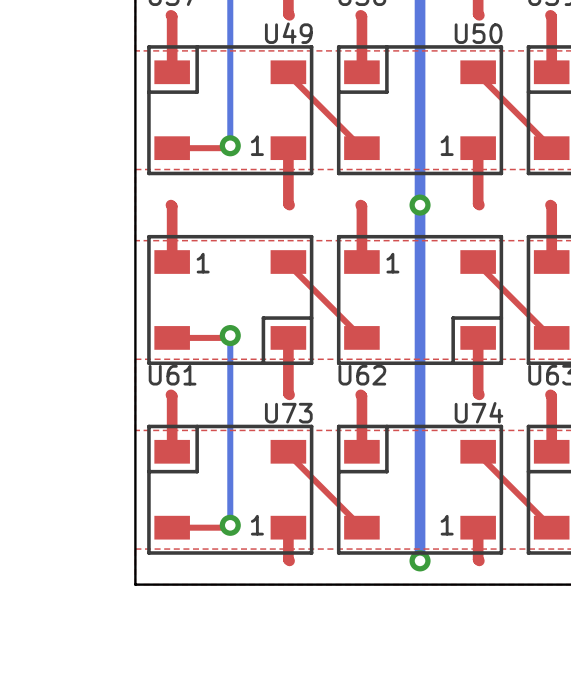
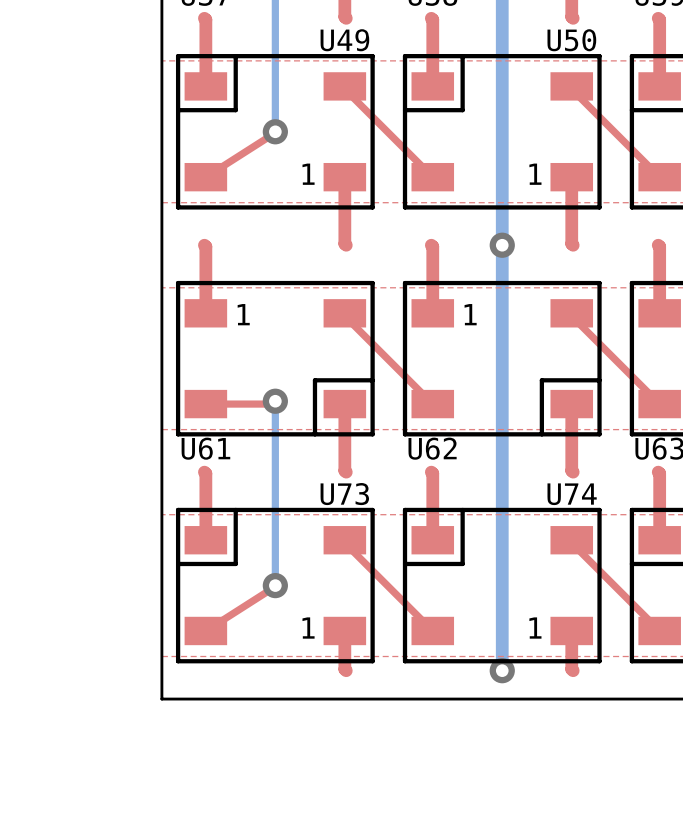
bottom track: (230, 110) (230, 145) -> none
top track: (230, 145) (227, 148) (172, 148) -> (275, 131) (205, 177)
via position: (230, 145) -> (275, 131)
bottom track: (230, 489) (230, 525) -> none
top track: (230, 525) (227, 527) (172, 527) -> (275, 585) (205, 630)
via position: (230, 525) -> (275, 585)

